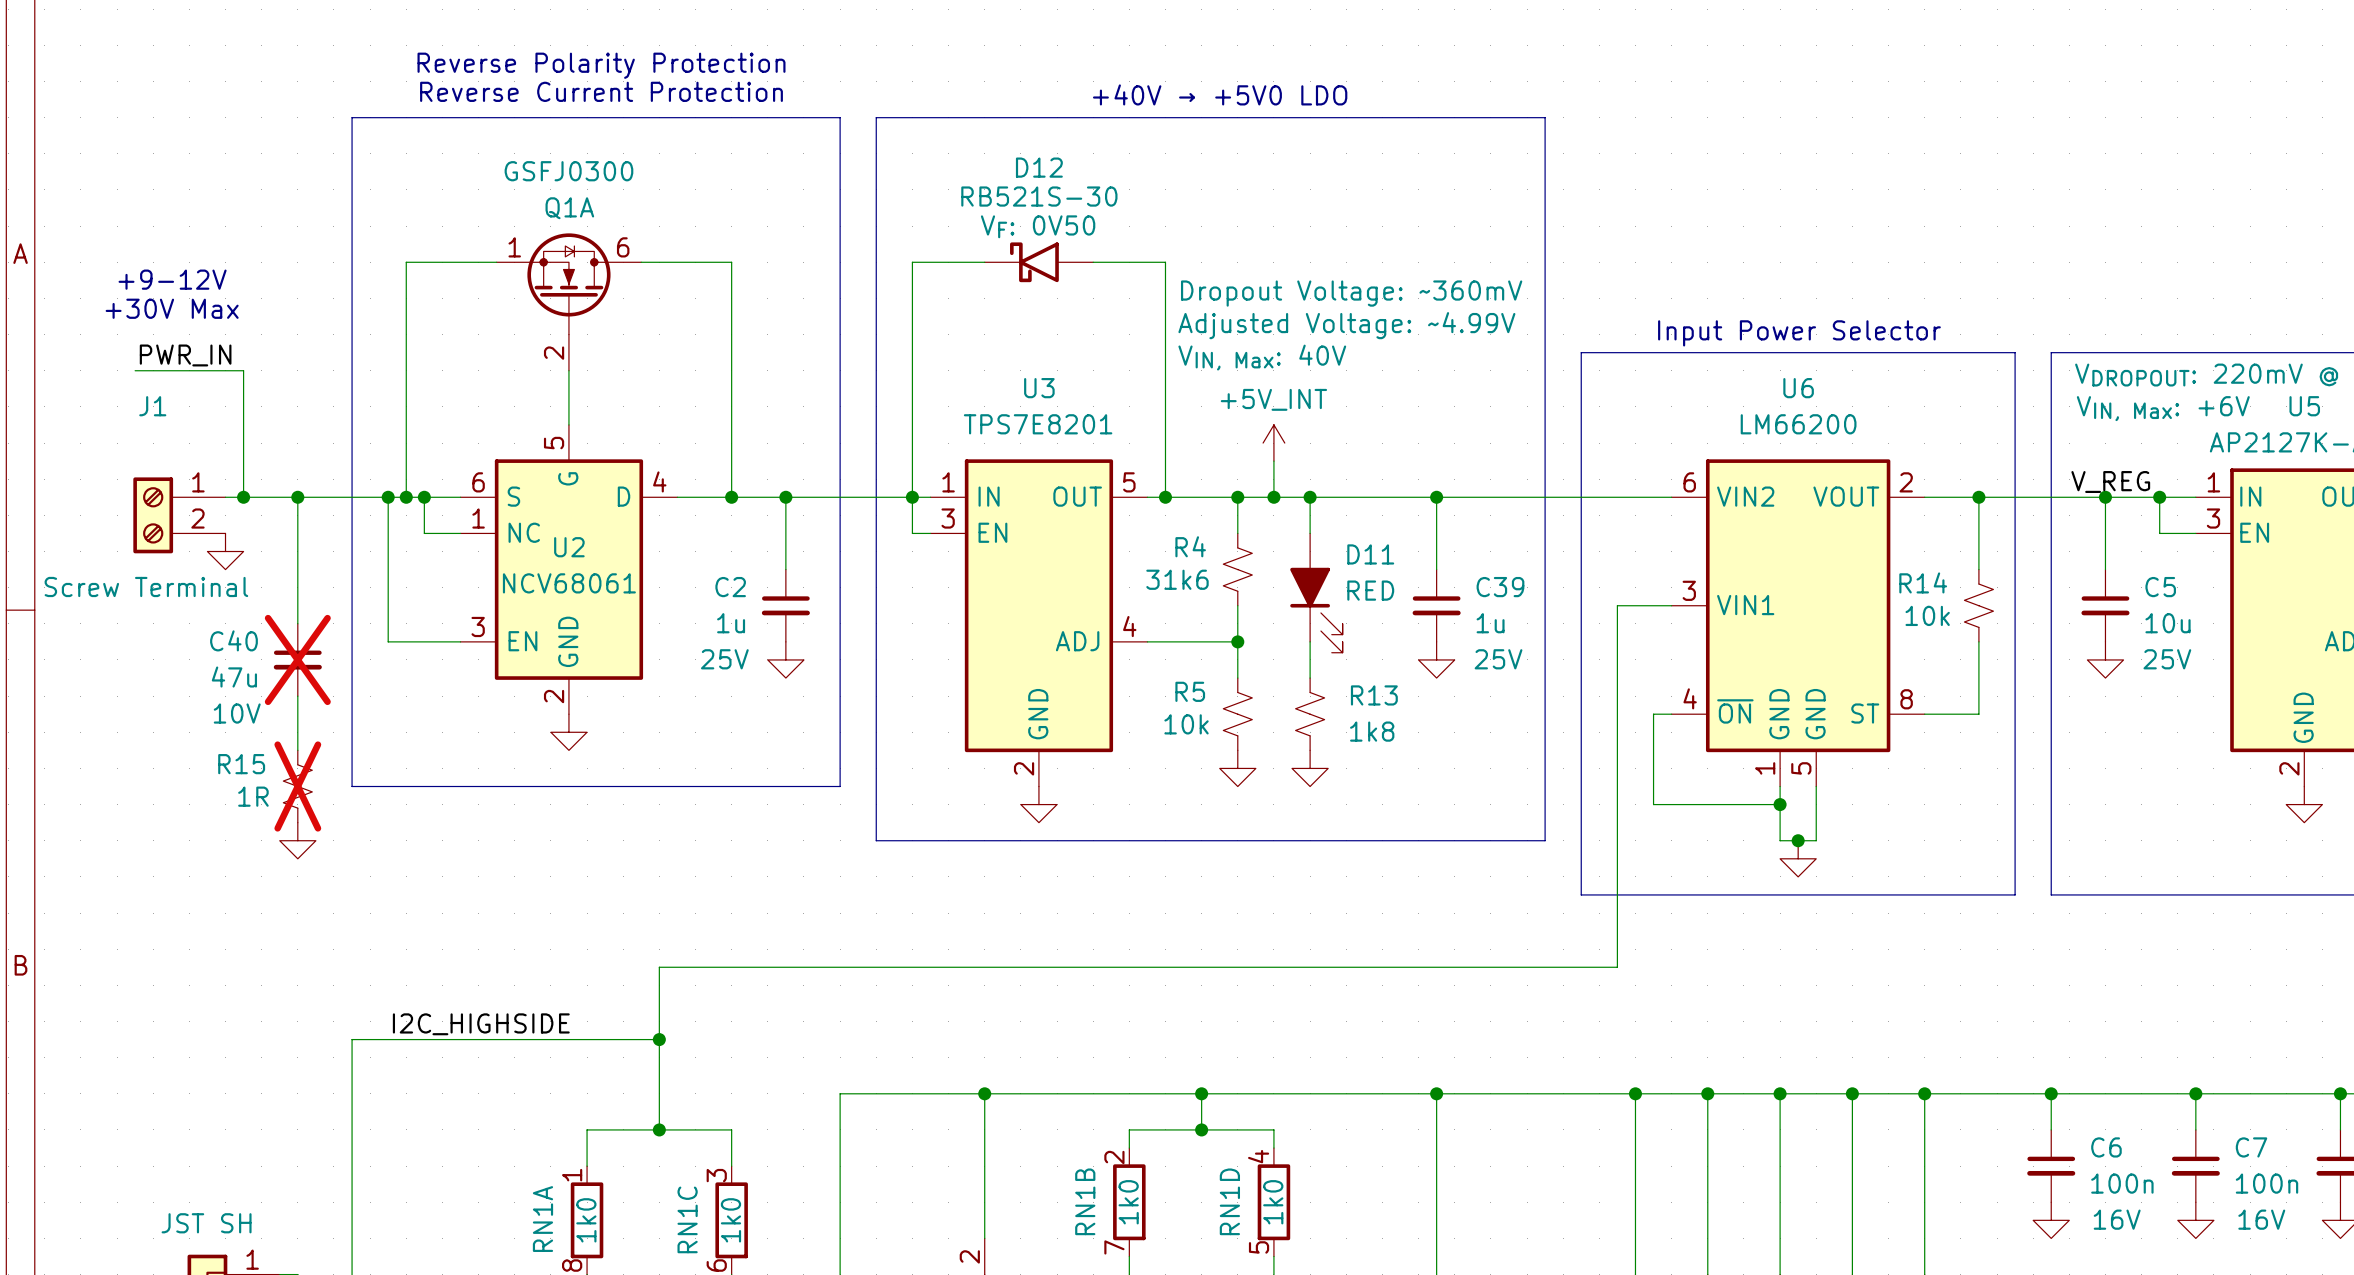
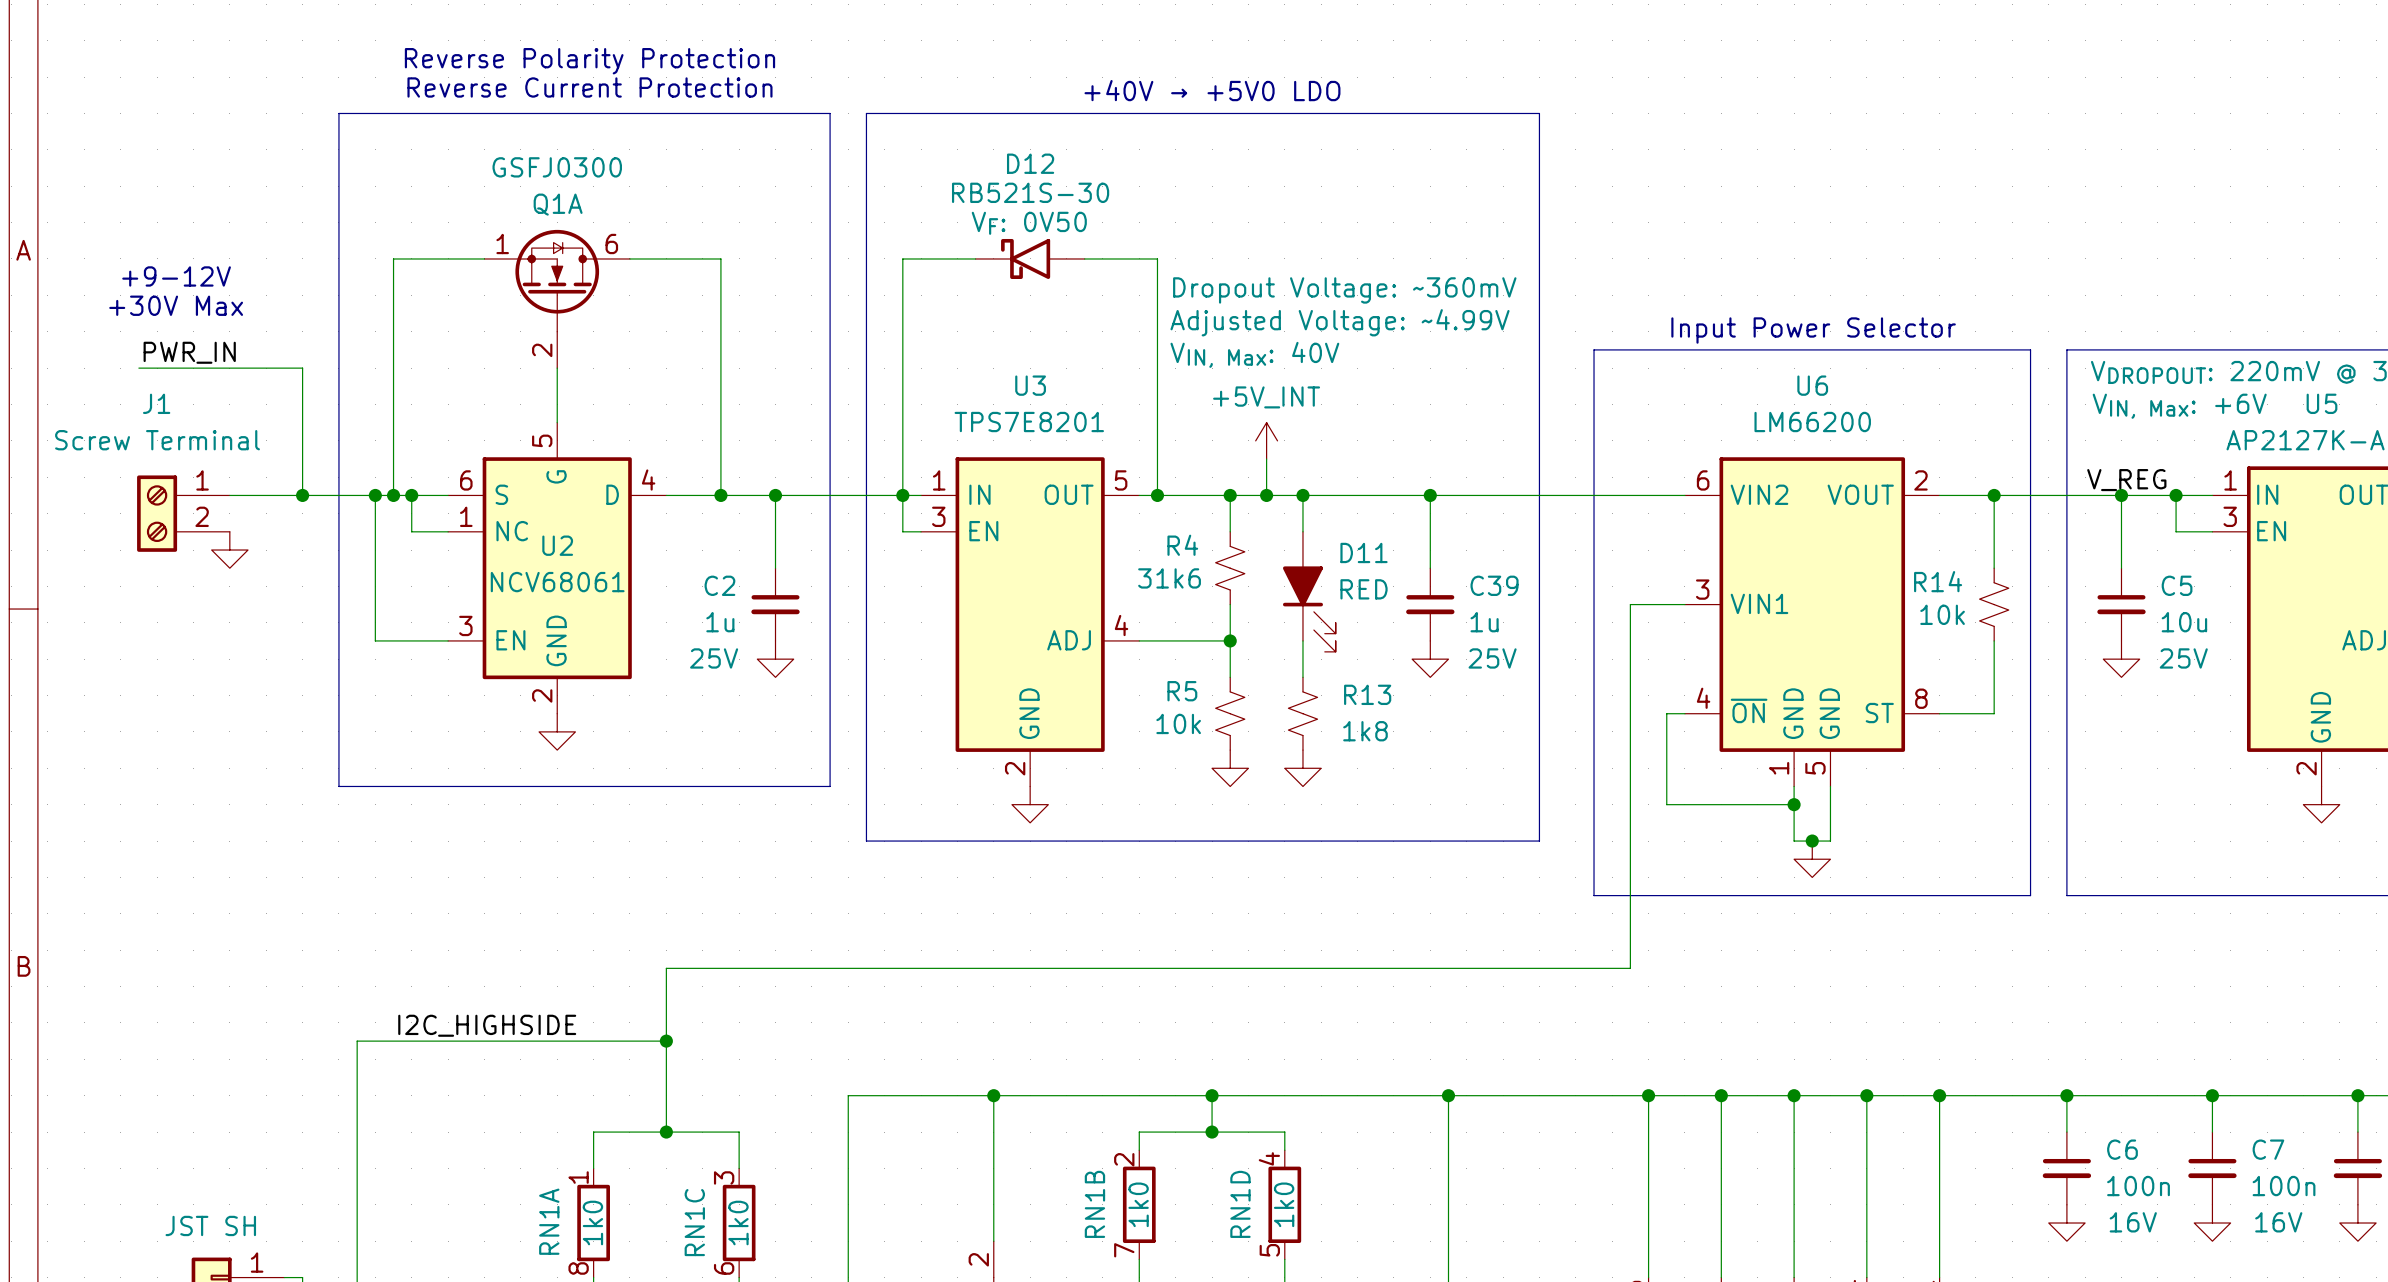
text position: Reverse Polarity Protection (601, 65) -> Reverse Polarity Protection (589, 61)
text position: Reverse Current Protection (601, 91) -> Reverse Current Protection (589, 87)
text position: +40V → +5V0 LDO (1220, 94) -> +40V → +5V0 LDO (1212, 90)
line: (352, 117) (352, 786) -> (357, 113) (338, 113) (338, 786) (357, 786)
line: (822, 117) (840, 117) (840, 786) (822, 786) -> (830, 113) (830, 786)
line: (876, 117) (876, 840) -> (884, 113) (866, 113) (866, 841) (884, 841)
line: (1527, 117) (1545, 117) (1545, 840) (1527, 840) -> (1539, 113) (1539, 841)
wire: (406, 262) (406, 497) -> (411, 258) (393, 258) (393, 495)
wire: (713, 262) (731, 262) (731, 497) -> (720, 258) (720, 495)
wire: (912, 262) (912, 533) (930, 533) -> (921, 258) (902, 258) (902, 531) (921, 531)
D12 position: (1038, 262) -> (1030, 258)
wire: (1147, 262) (1165, 262) (1165, 497) -> (1157, 258) (1157, 495) (1139, 495)
Q1A position: (568, 302) -> (557, 299)
wire: (243, 370) (243, 497) -> (248, 368) (302, 368) (302, 495)
wire: (568, 370) (568, 424) -> (557, 368) (557, 422)
power symbol position: +5V_INT (1273, 443) -> +5V_INT (1266, 440)
wire: (1273, 461) (1273, 497) -> (1266, 459) (1266, 495)
junction: (243, 497) -> none
wire: (297, 497) (297, 623) -> none
wire: (388, 497) (388, 641) -> (375, 495) (375, 640) (393, 640)
wire: (424, 497) (424, 533) -> (411, 495) (411, 531) (429, 531)
junction position: (424, 497) -> (375, 495)
junction: none -> (720, 495)
junction: (731, 497) -> none
junction: none -> (775, 495)
wire: (785, 497) (785, 569) -> (775, 495) (775, 568)
junction: (785, 497) -> none
junction position: (912, 497) -> (902, 495)
junction position: (1165, 497) -> (1157, 495)
junction: none -> (1230, 495)
wire: (1237, 497) (1237, 533) -> (1230, 495) (1230, 531)
junction: (1237, 497) -> none
junction: none -> (1266, 495)
junction: (1273, 497) -> none
junction: none -> (1302, 495)
wire: (1310, 497) (1310, 533) -> (1302, 495) (1302, 531)
junction: (1310, 497) -> none
wire: (1436, 497) (1436, 569) -> (1430, 495) (1430, 568)
junction position: (1436, 497) -> (1430, 495)
U2 position: (568, 569) -> (557, 568)
R4 position: (1237, 569) -> (1230, 568)
J1 value position: Screw Terminal (146, 586) -> Screw Terminal (157, 440)
D11 position: (1316, 593) -> (1309, 591)
C2 position: (785, 605) -> (775, 604)
wire: (1237, 605) (1237, 678) -> (1230, 604) (1230, 677)
C39 position: (1436, 605) -> (1430, 604)
U3 position: (1038, 622) -> (1030, 621)
junction position: (1237, 641) -> (1230, 640)
wire: (1310, 641) (1310, 678) -> (1302, 640) (1302, 677)
C40: 47u (297, 659) -> none
power symbol position: (785, 659) -> (775, 659)
power symbol position: (1436, 659) -> (1430, 659)
wire: (297, 696) (297, 750) -> none
R5 position: (1237, 714) -> (1230, 713)
R13 position: (1310, 714) -> (1302, 713)
power symbol position: (568, 732) -> (557, 731)
power symbol position: (1237, 768) -> (1230, 768)
power symbol position: (1310, 768) -> (1302, 768)
R15: 1R (297, 786) -> none
power symbol position: (1038, 804) -> (1030, 804)
power symbol: (297, 840) -> none

